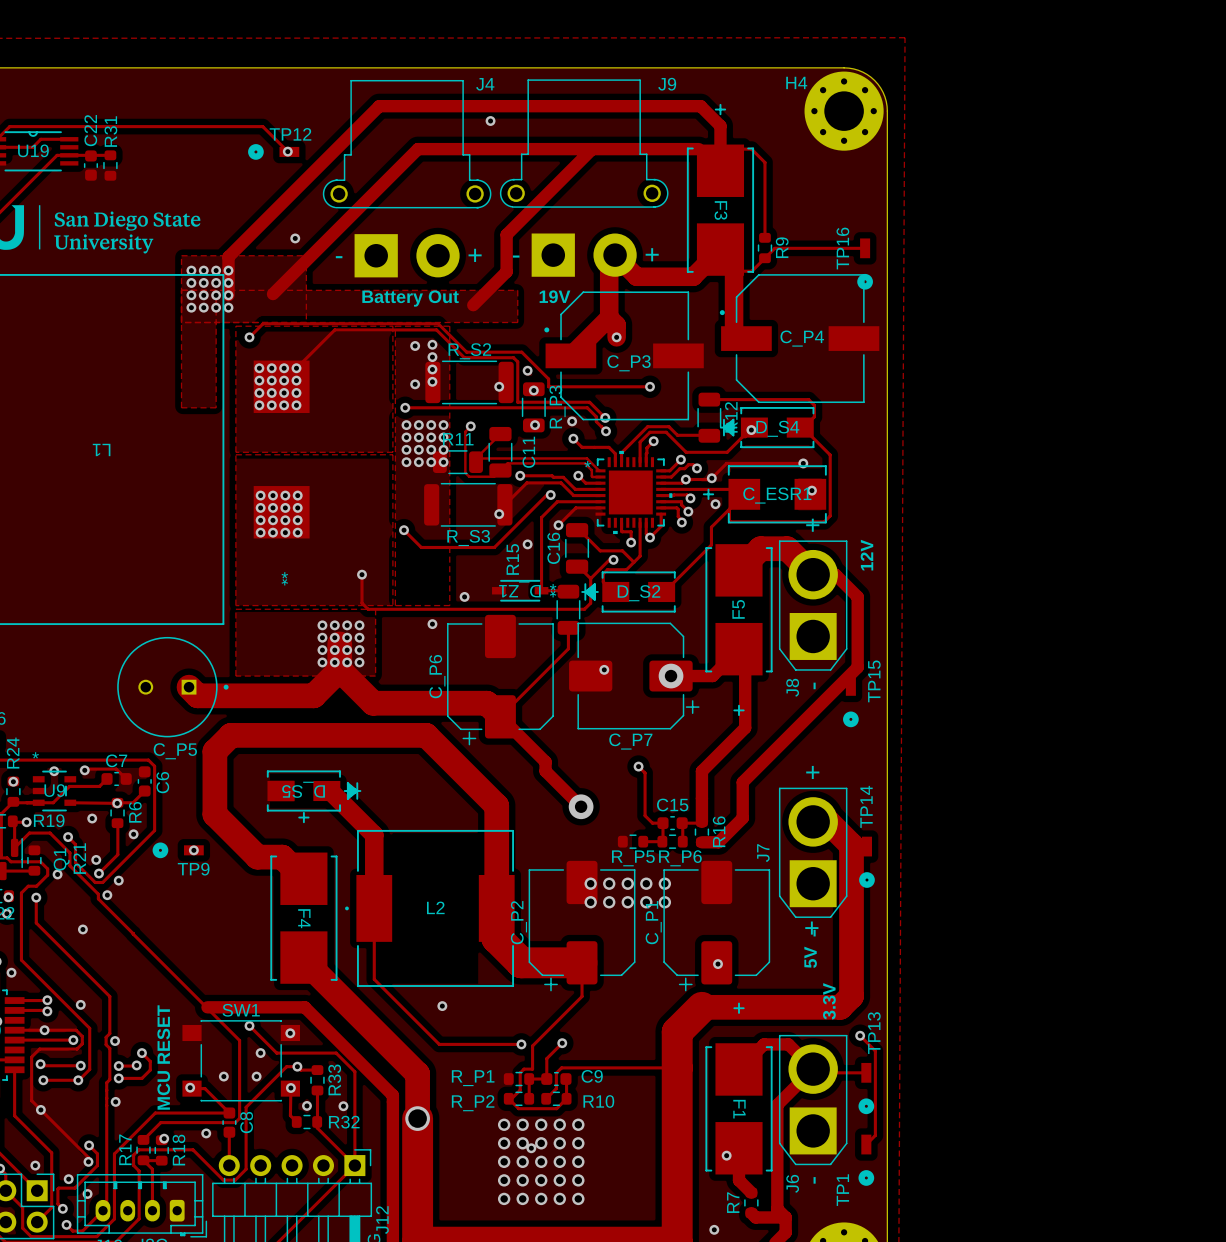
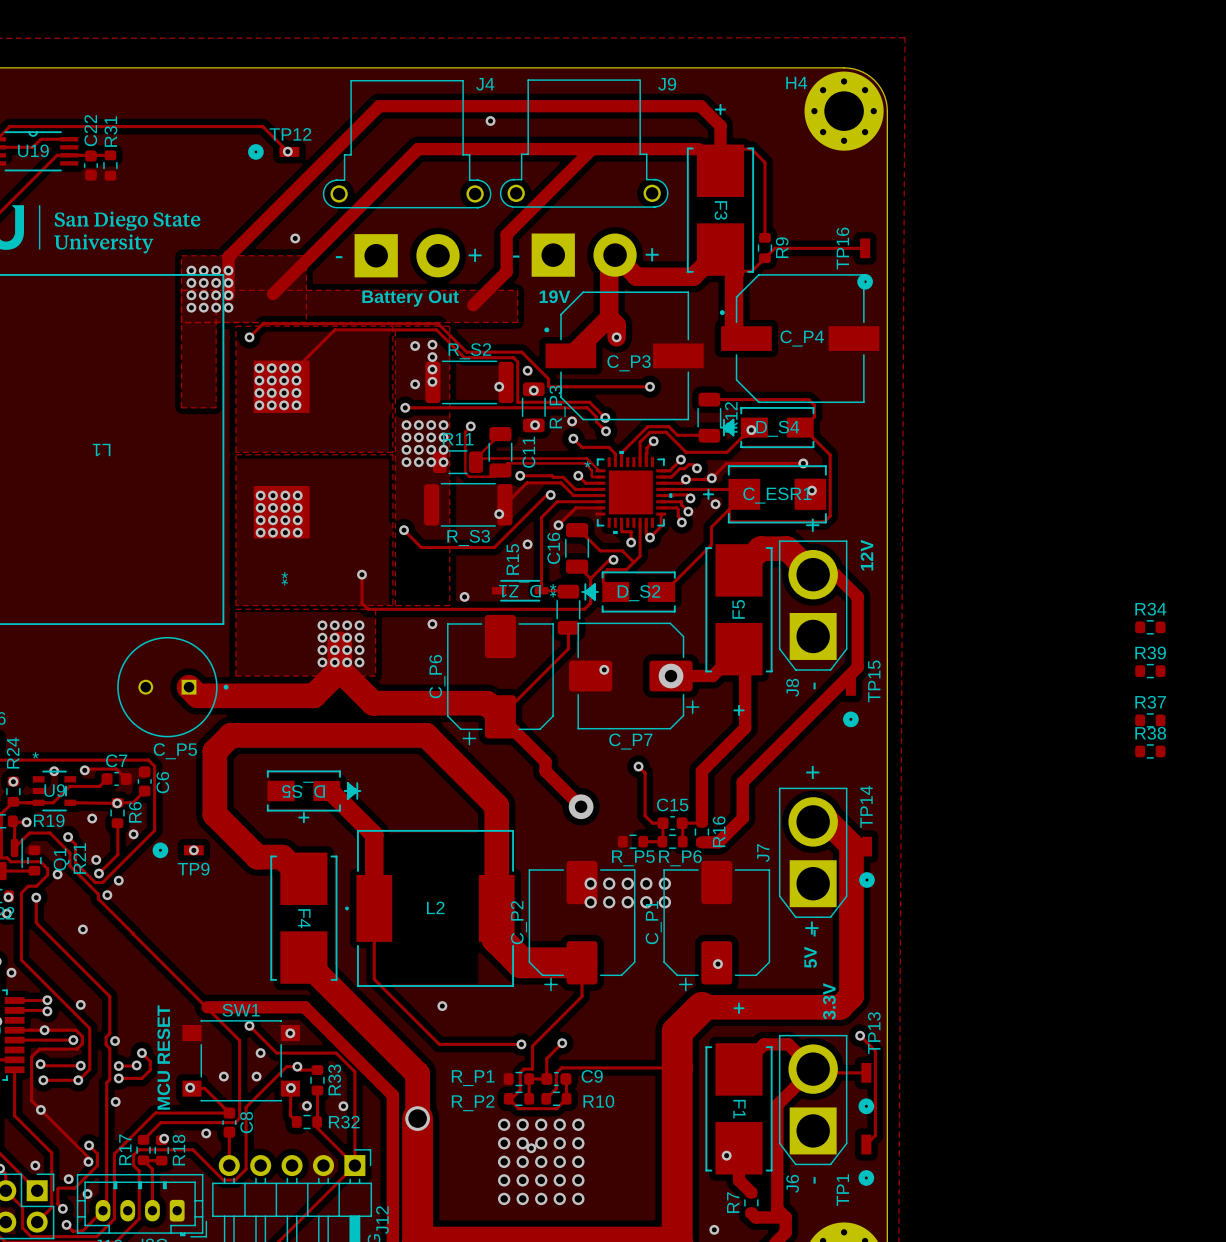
R34: none -> (1150, 627)
R39: none -> (1150, 671)
R37: none -> (1150, 720)
R38: none -> (1150, 751)

